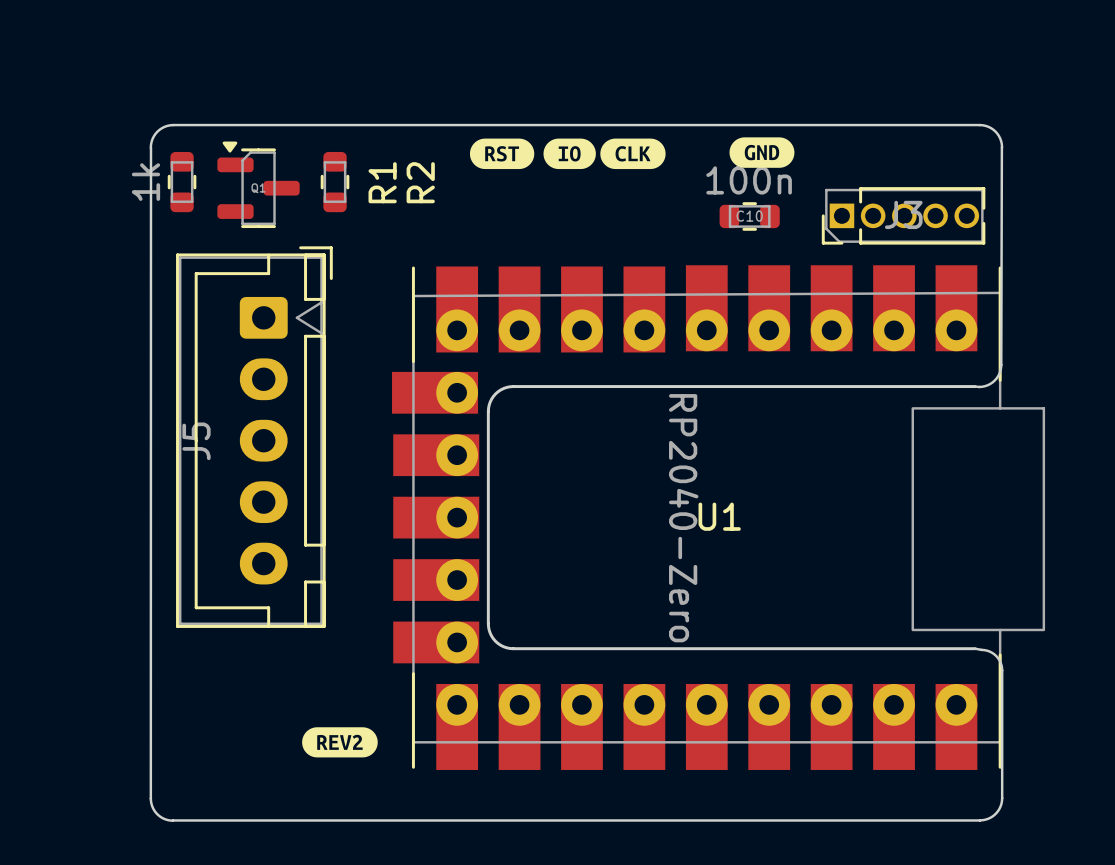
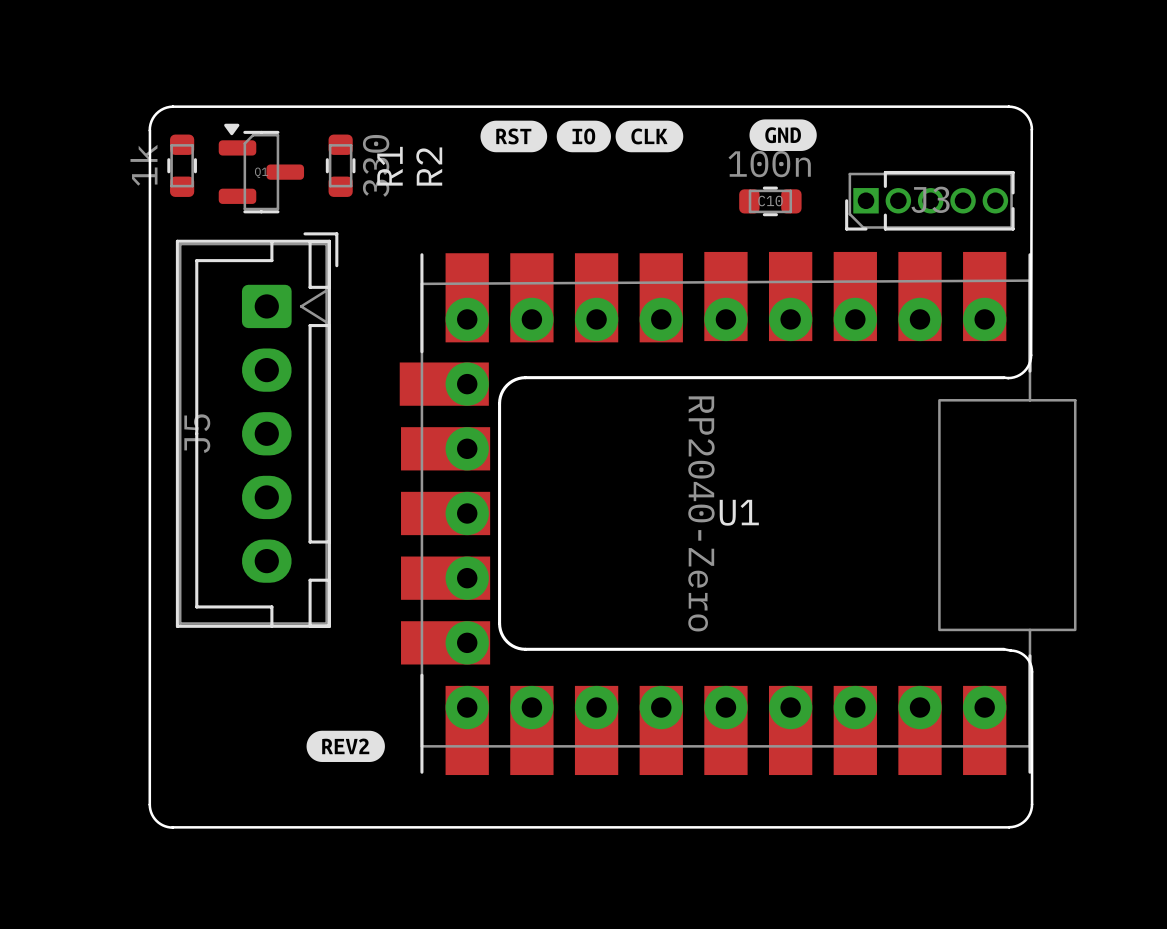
R2 value: none -> 330 (376, 165)

